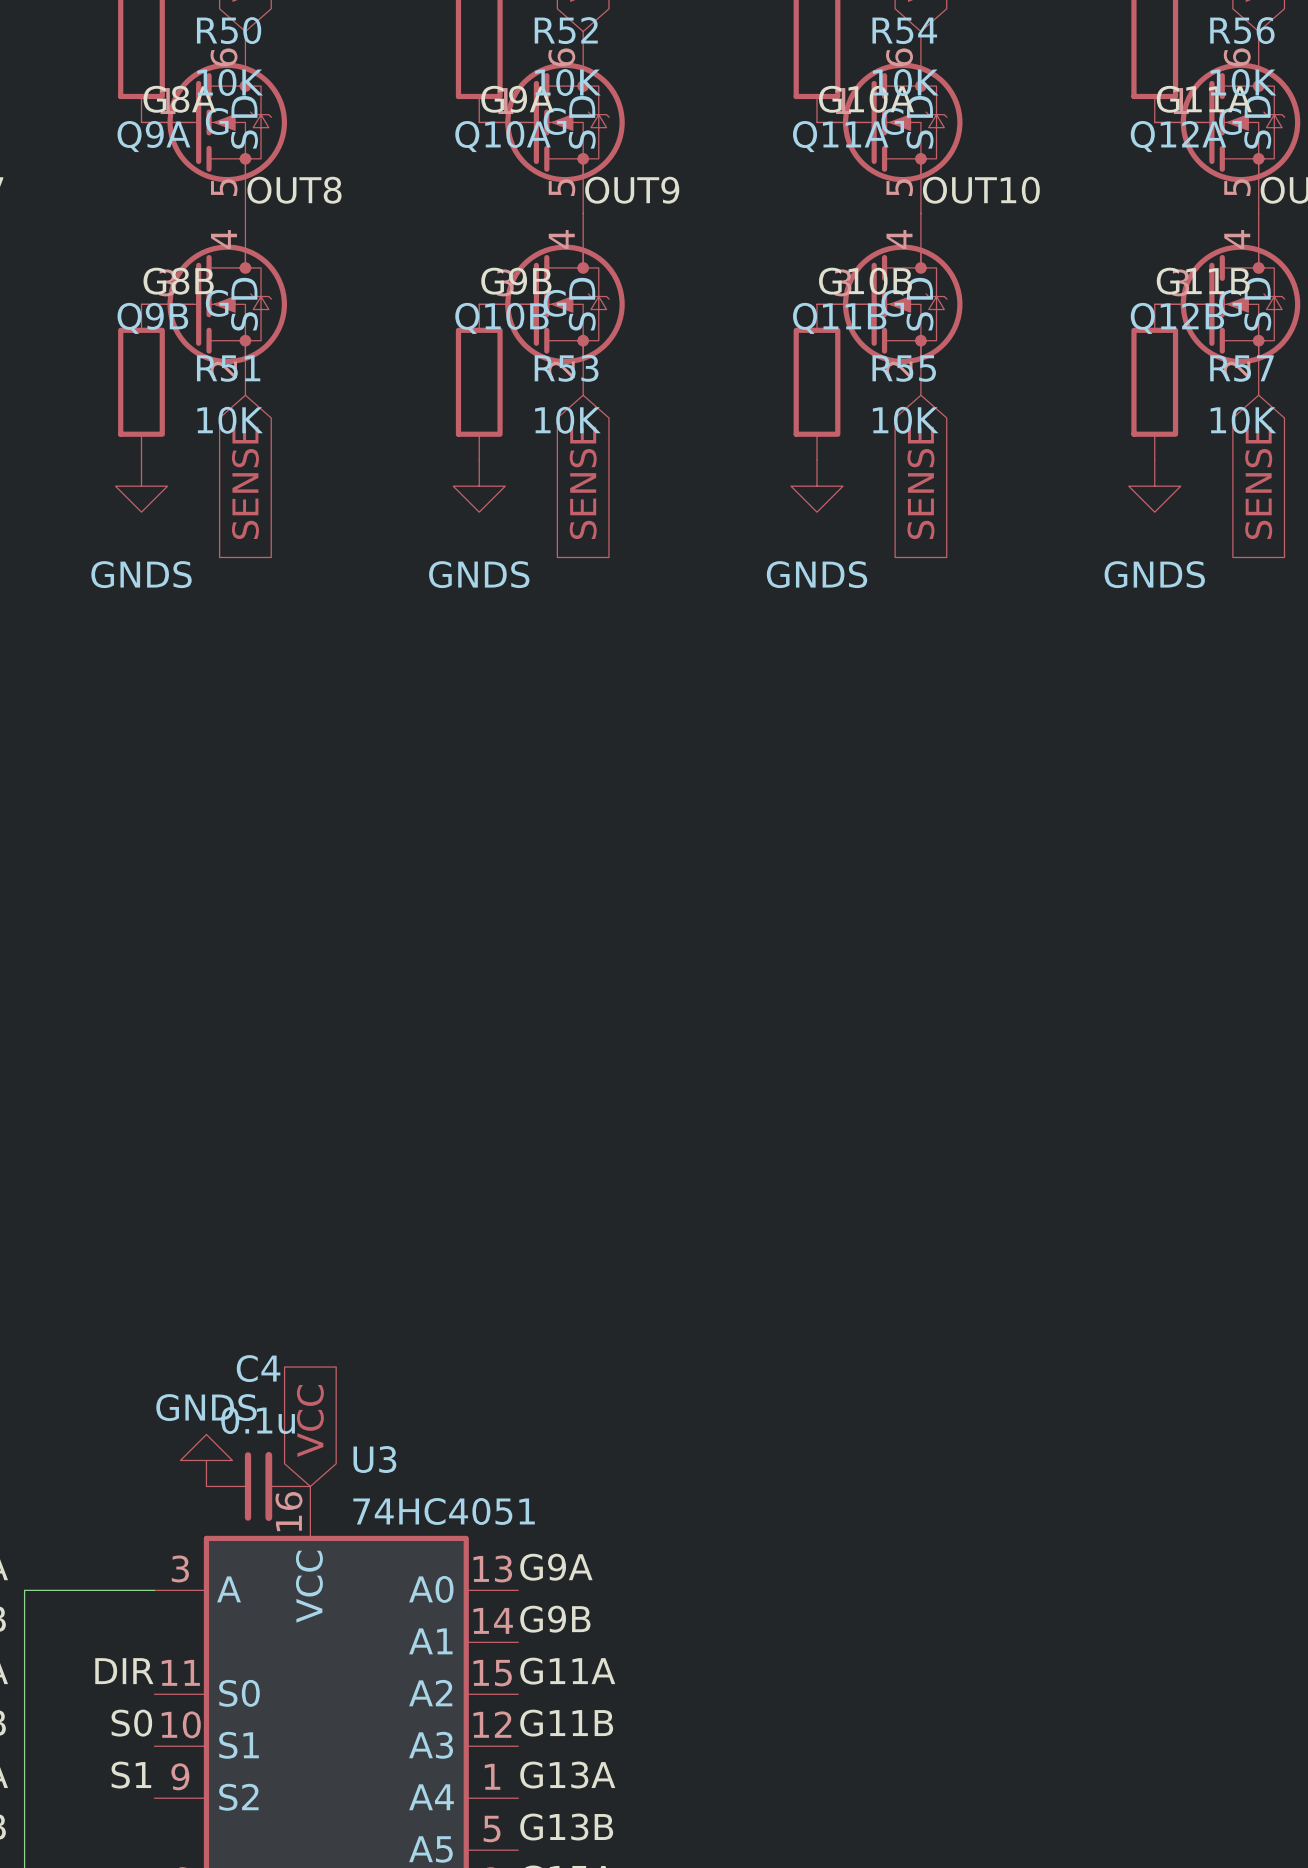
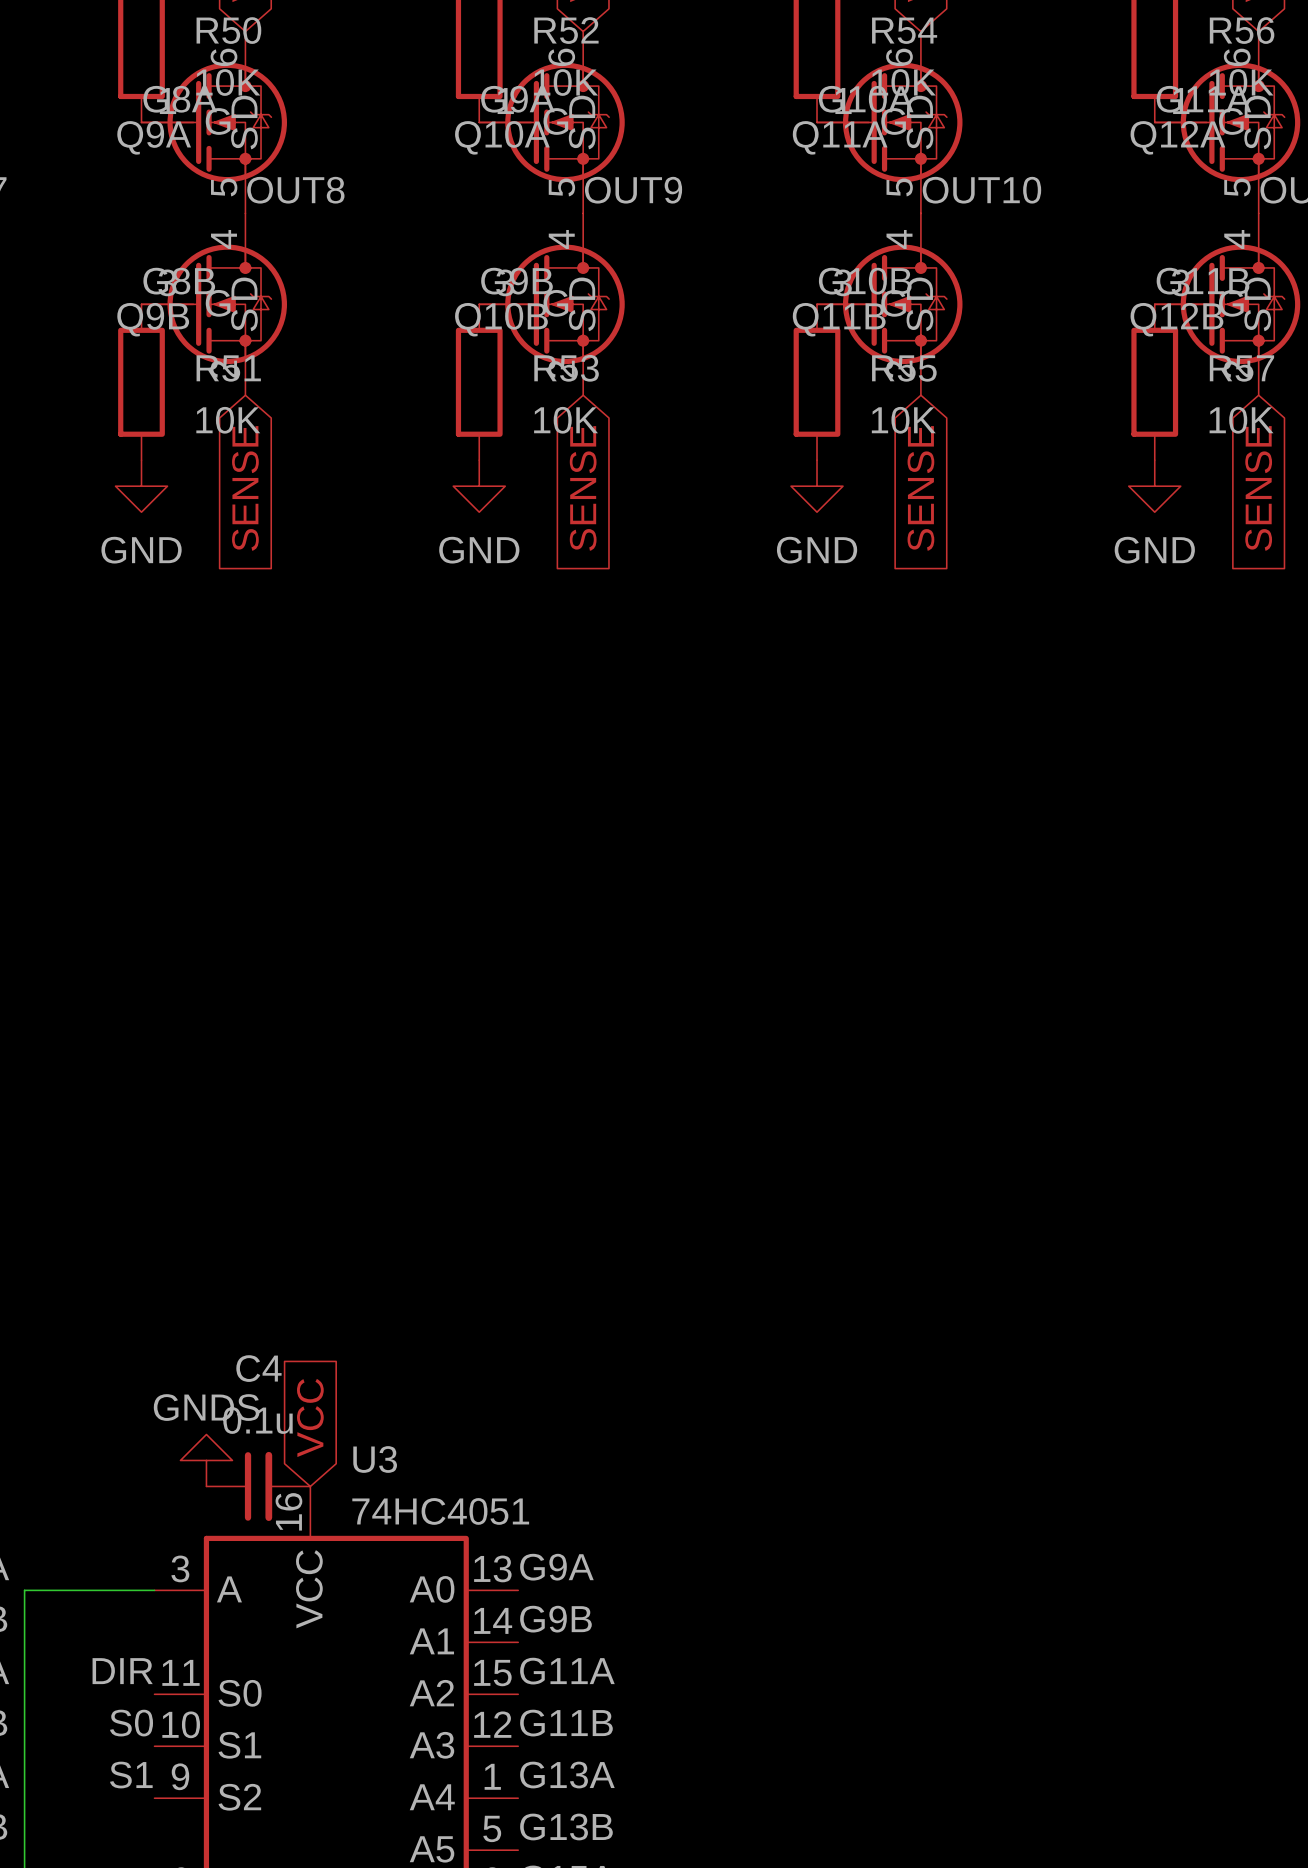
power symbol: GNDS (141, 486) -> GND (141, 486)
power symbol: GNDS (479, 486) -> GND (479, 486)
power symbol: GNDS (817, 486) -> GND (817, 486)
power symbol: GNDS (1154, 486) -> GND (1154, 486)

